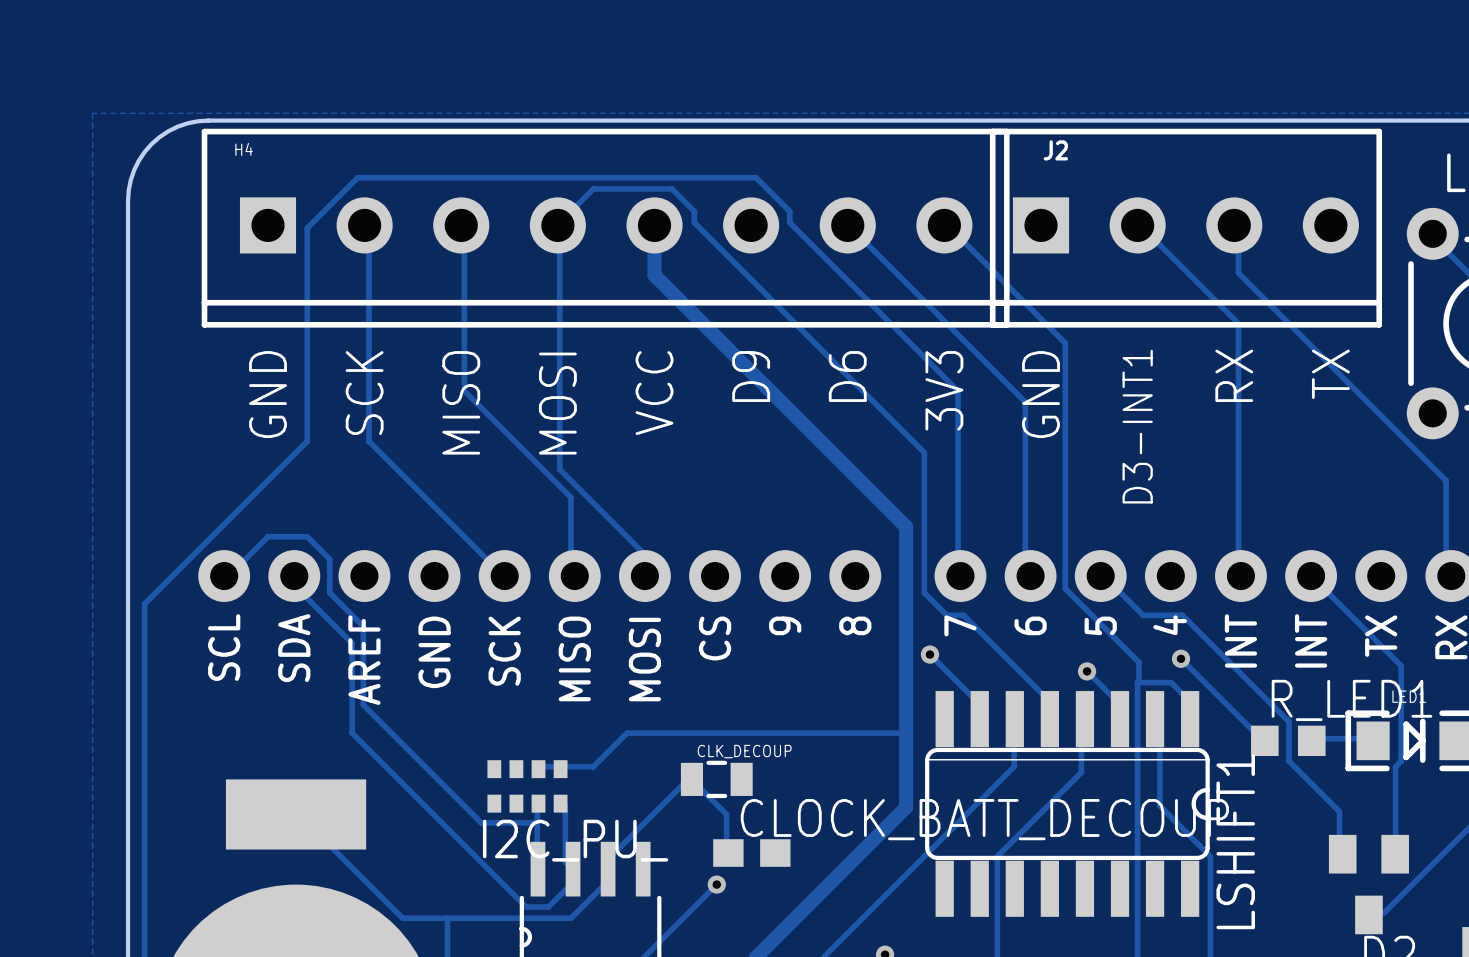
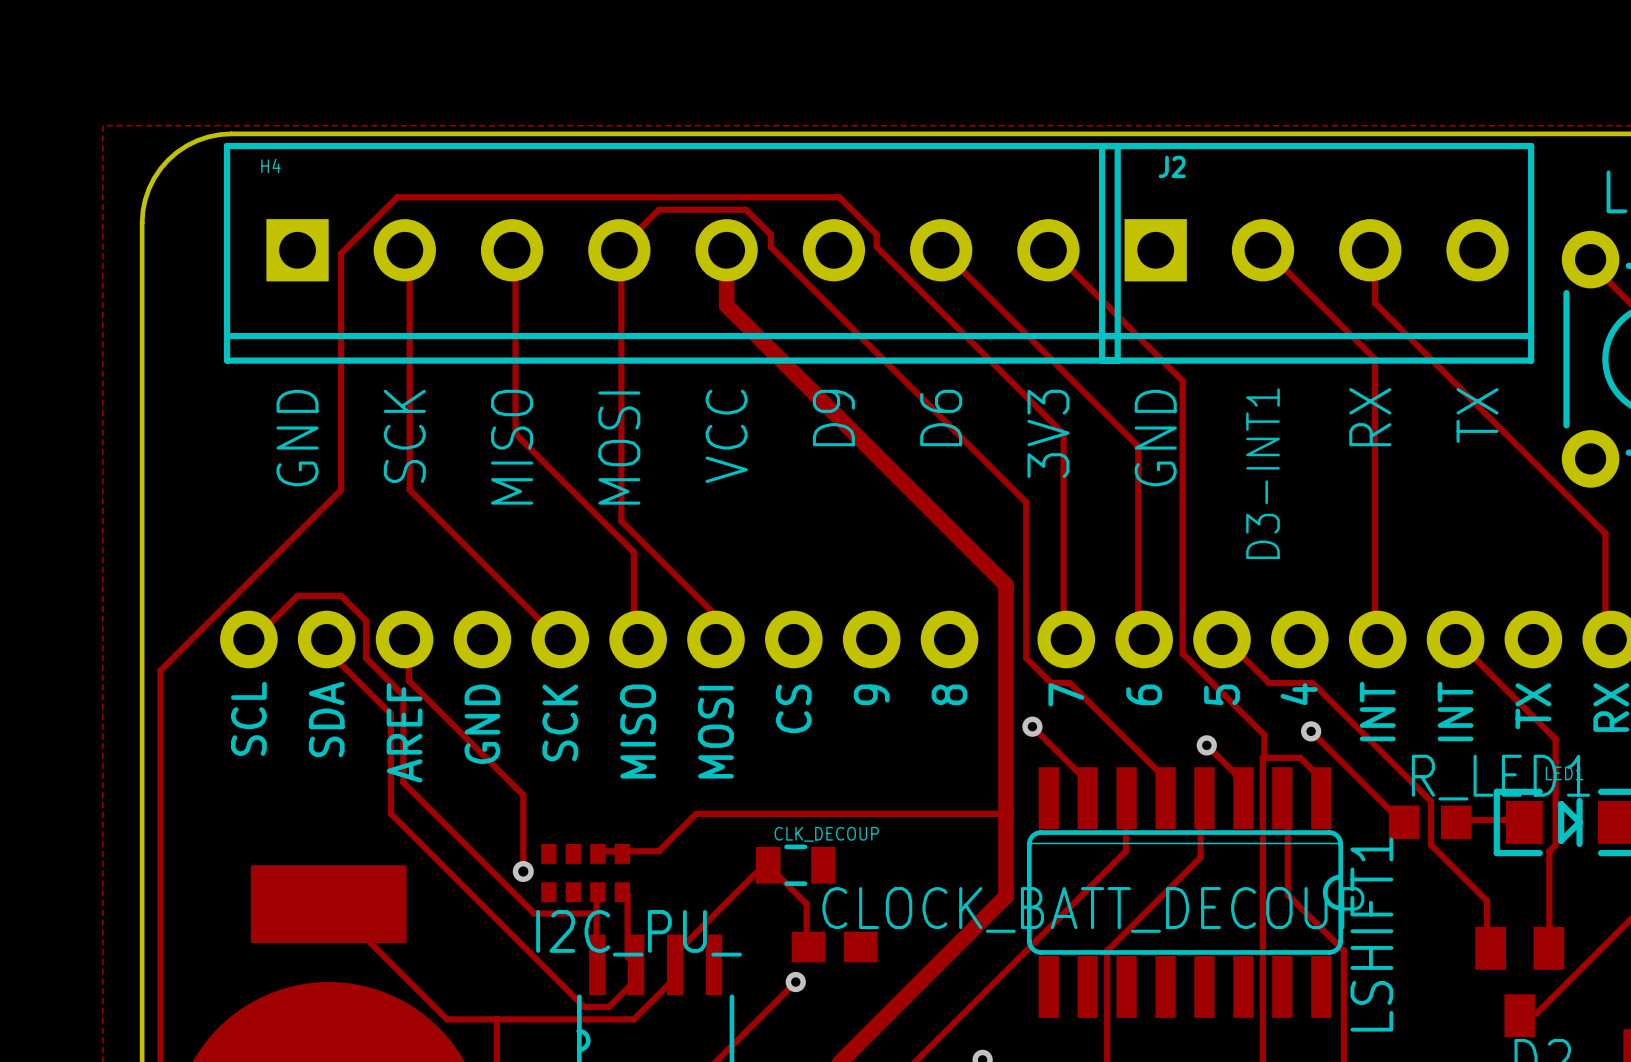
track: none -> (404, 639) (408, 642) (408, 680) (523, 795) (523, 871)
via: none -> (523, 871)

